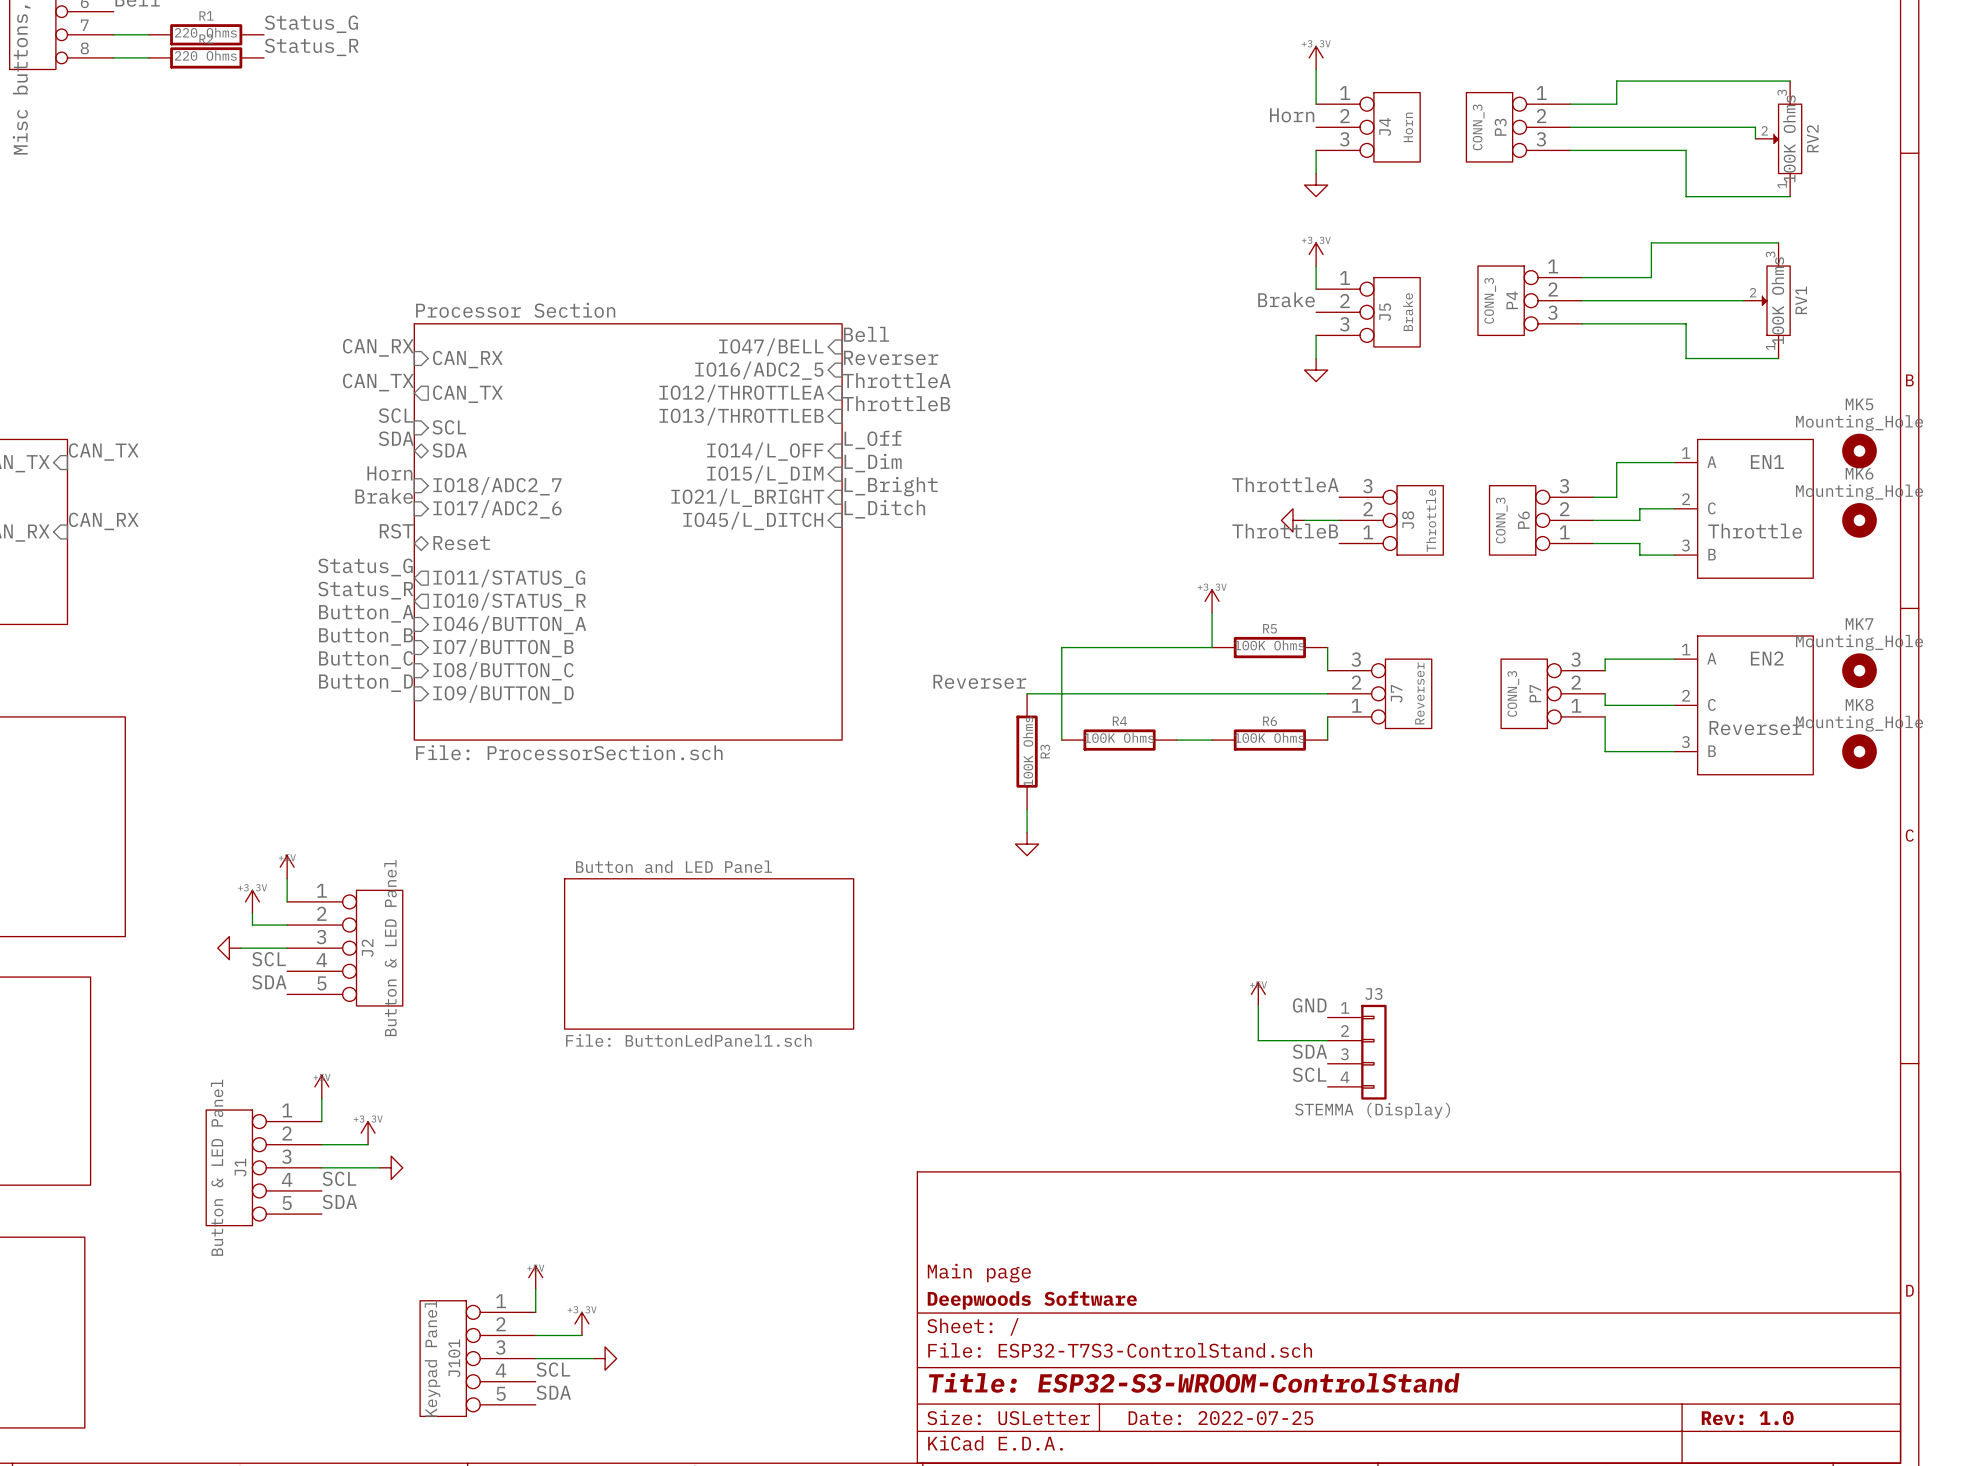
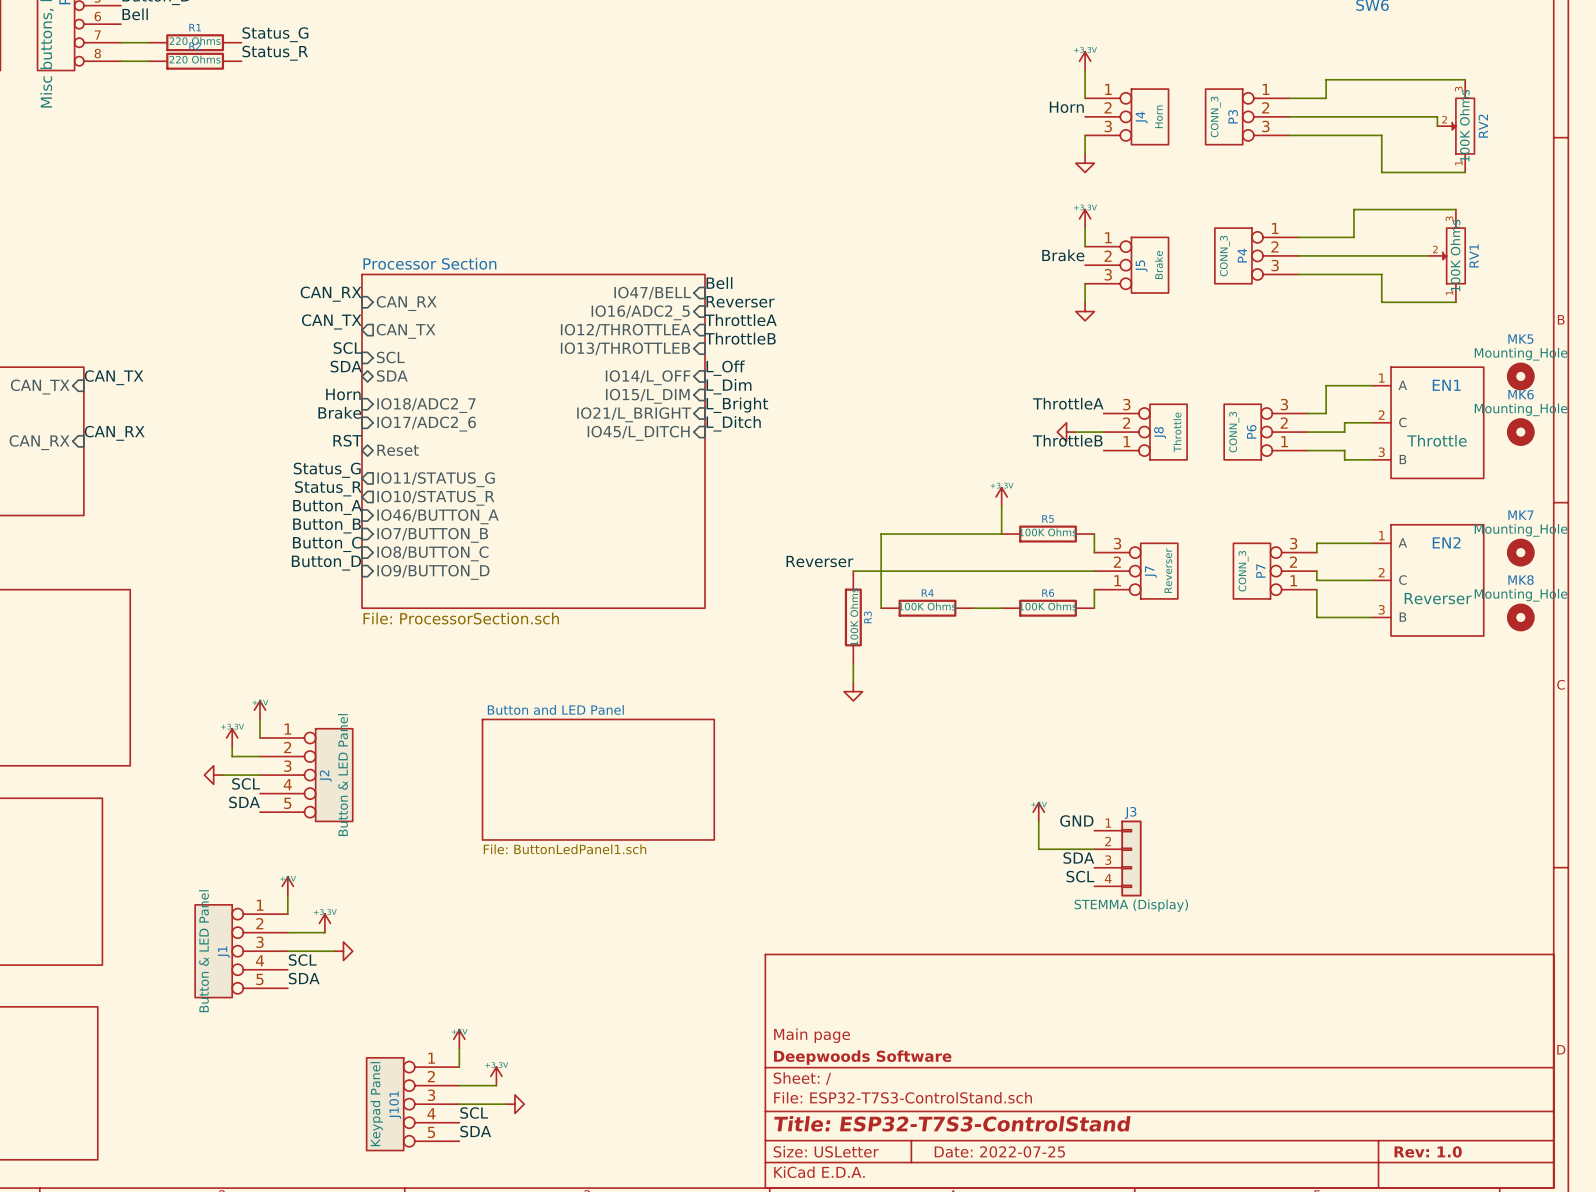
title block: Title: ESP32-S3-WROOM-ControlStand (1194, 1382) -> Title: ESP32-T7S3-ControlStand (952, 1123)

